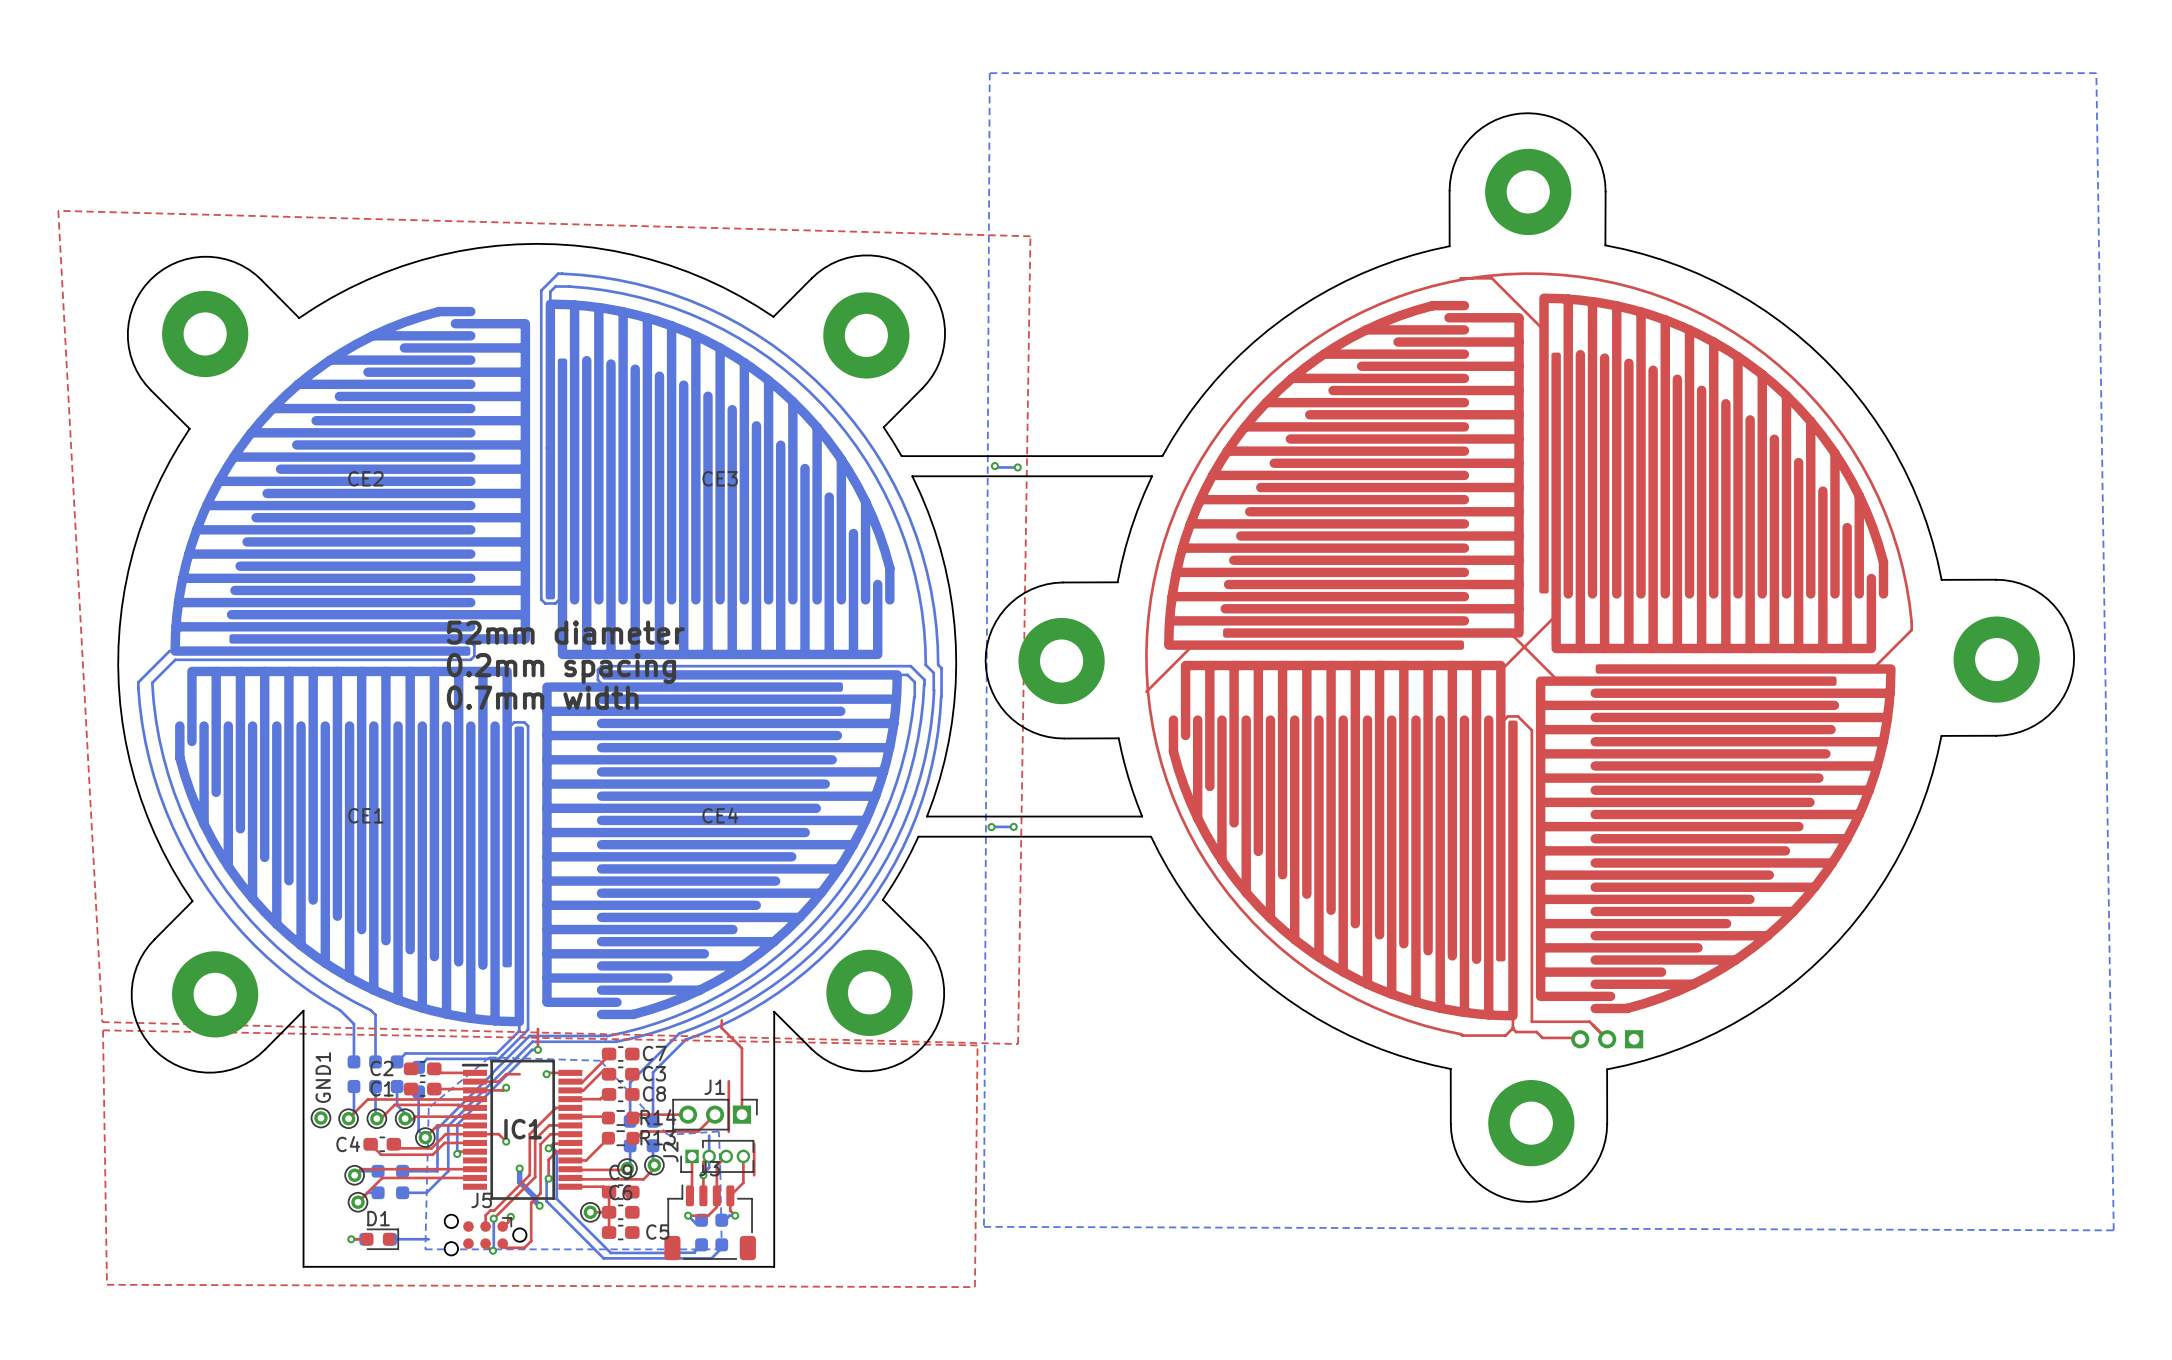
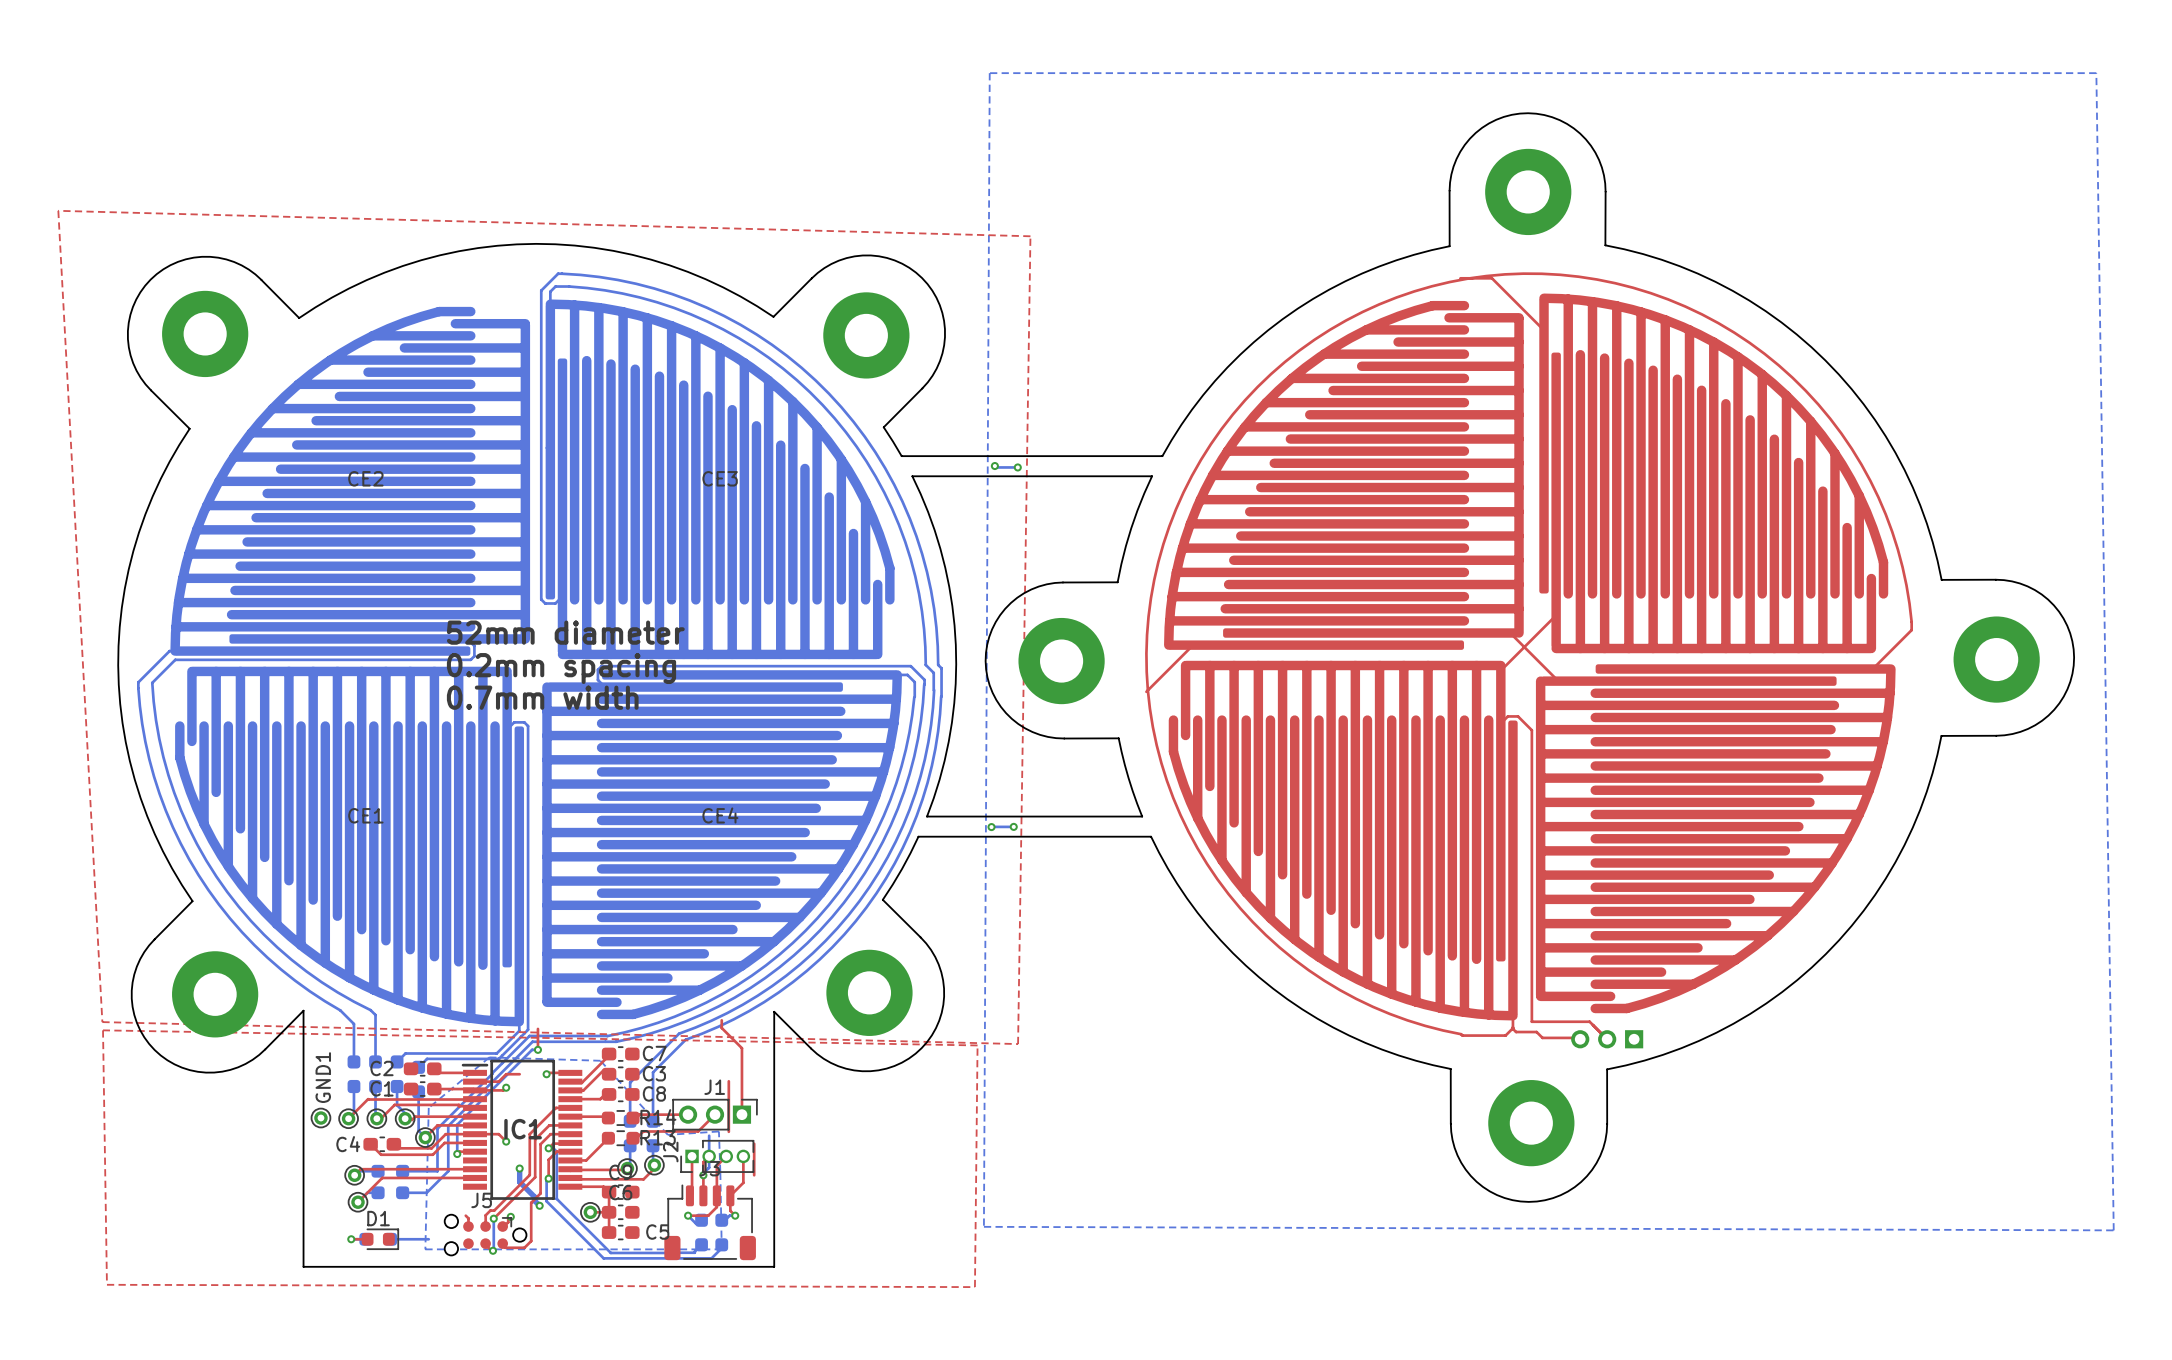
top track: none -> (465, 1215) (468, 1218) (468, 1227)

